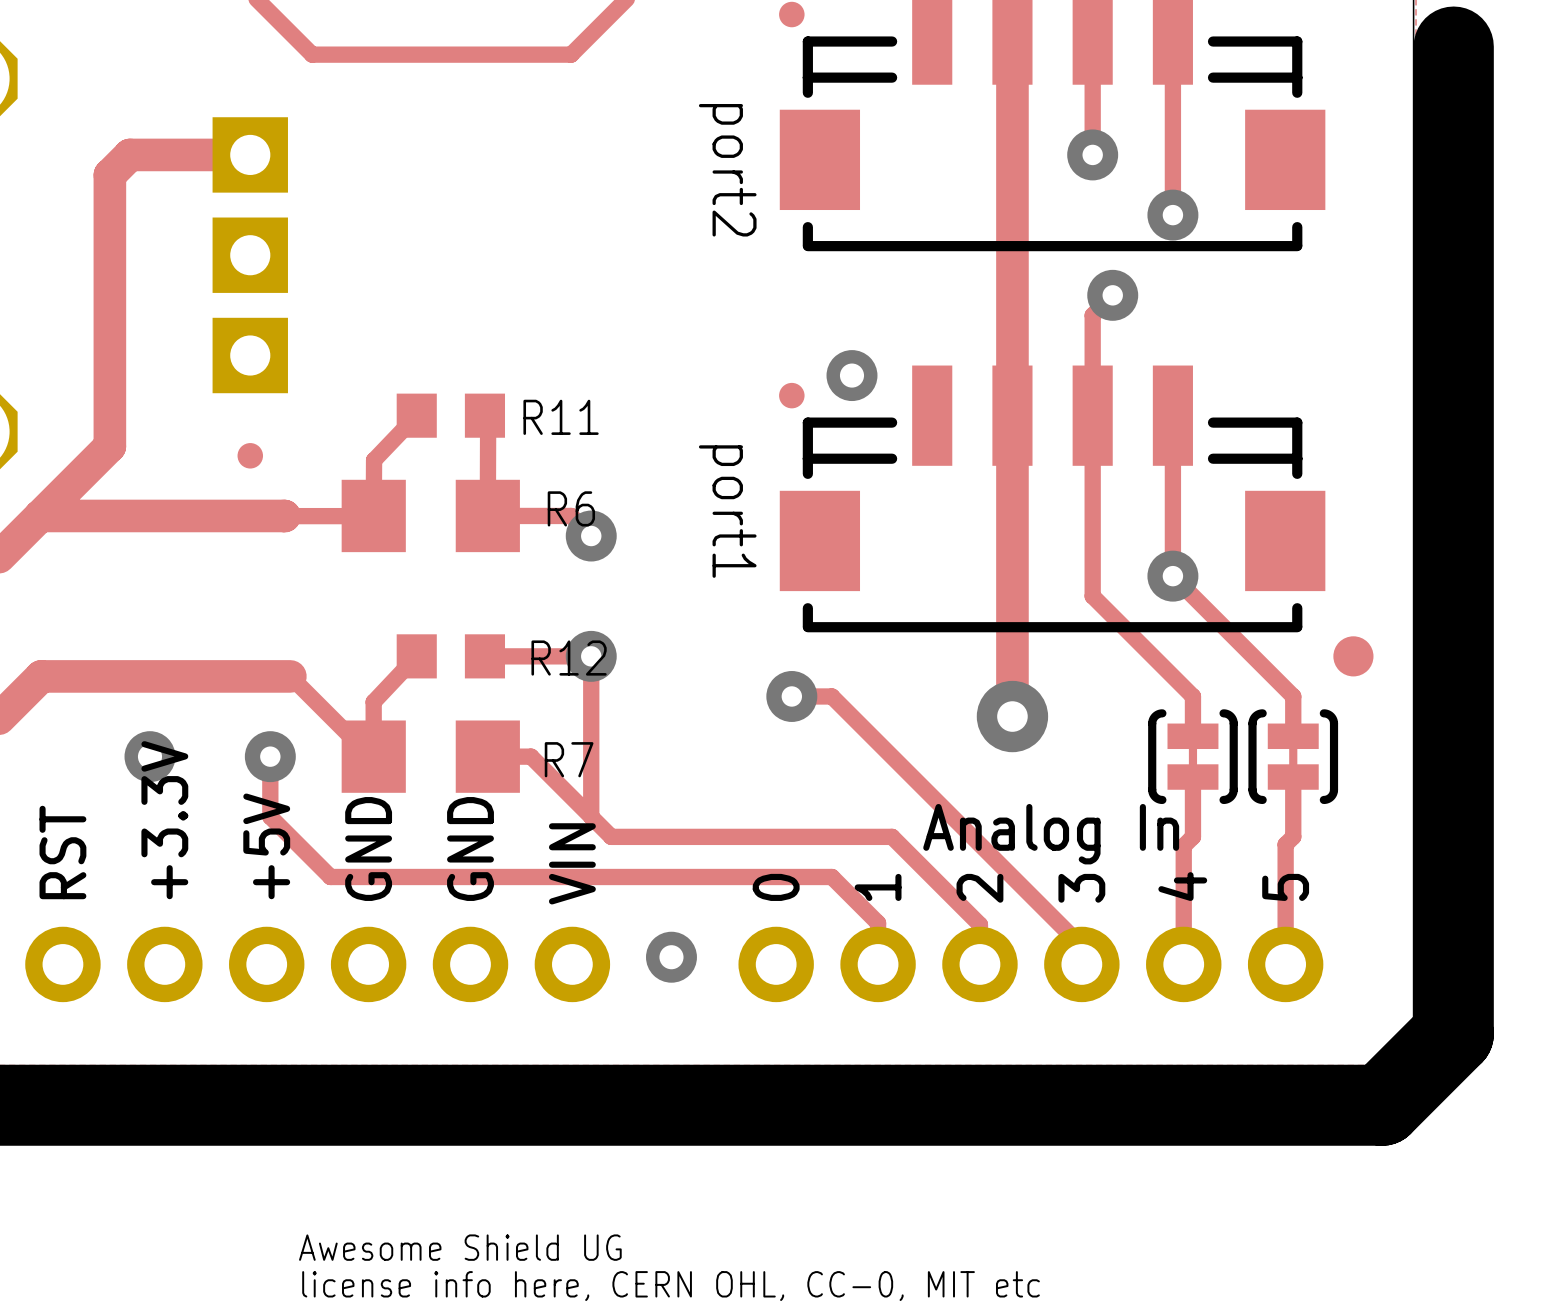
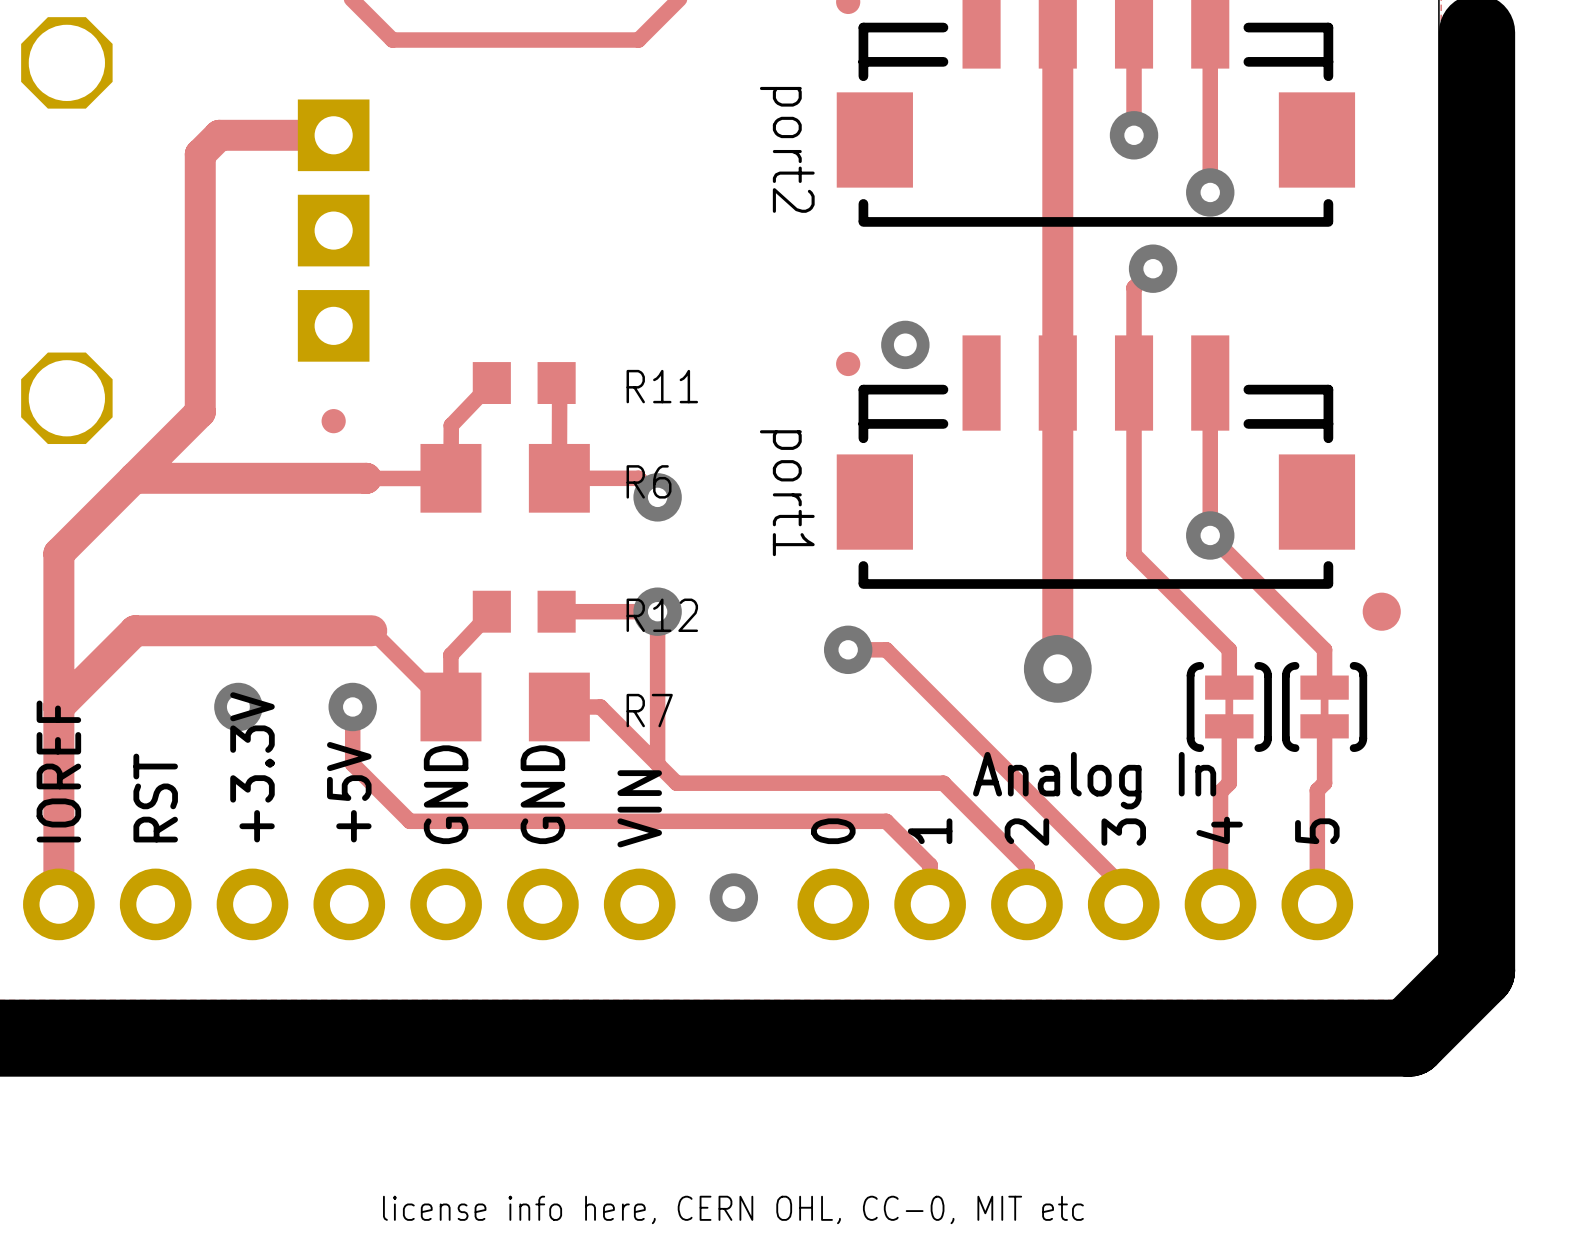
R11 name position: R11 (561, 417) -> R11 (662, 386)
R6 name position: R6 (571, 508) -> R6 (649, 481)
text position: port1 (727, 511) -> port1 (787, 493)
R12 name position: R12 (569, 658) -> R12 (662, 615)
R7 name position: R7 (569, 759) -> R7 (649, 710)
text: Awesome Shield UG (460, 1247) -> none

